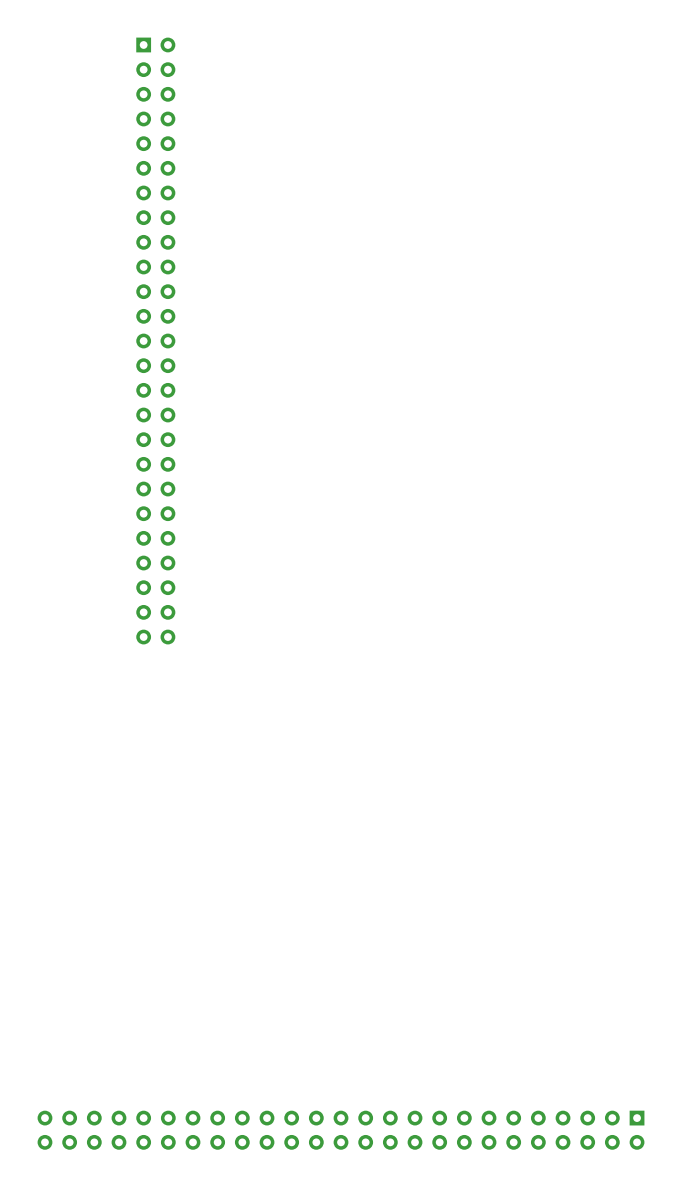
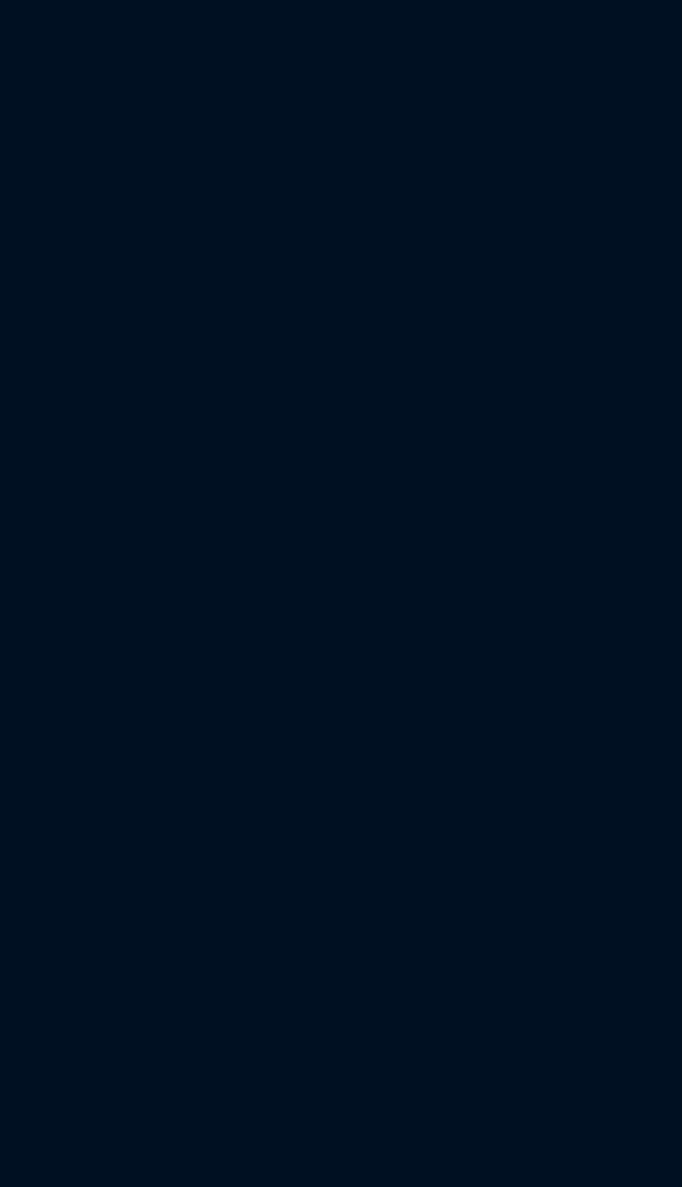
part: (155, 341) -> none
part: (341, 1130) -> none

